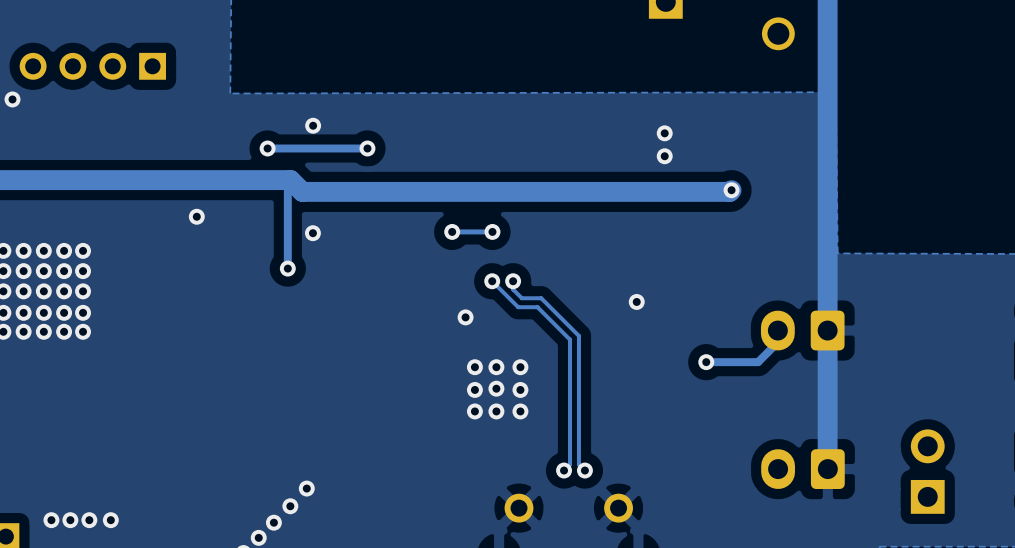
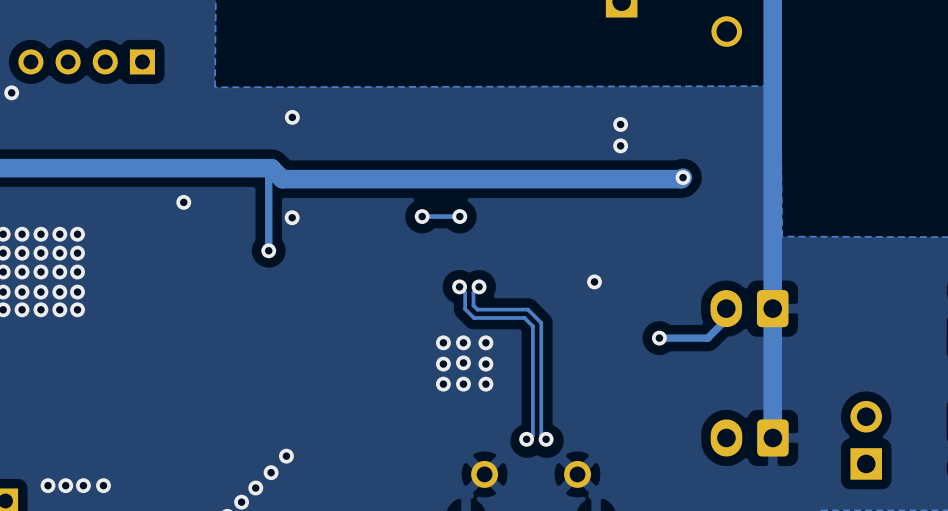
via: (267, 148) -> none
track: (367, 148) (267, 148) -> none
via: (367, 148) -> none
track: (492, 281) (518, 307) (537, 307) (570, 339) (570, 464) (564, 470) -> none
via: (492, 281) -> none
track: (513, 281) (513, 289) (521, 298) (541, 298) (578, 335) (578, 464) (584, 470) -> none
via: (513, 281) -> none
track: none -> (459, 286) (465, 292) (465, 309) (474, 317) (524, 317) (532, 326) (532, 435) (527, 440)
via: none -> (459, 286)
track: none -> (479, 286) (473, 292) (473, 305) (477, 309) (528, 309) (541, 322) (541, 435) (546, 440)
via: none -> (479, 286)
via: (465, 317) -> none

